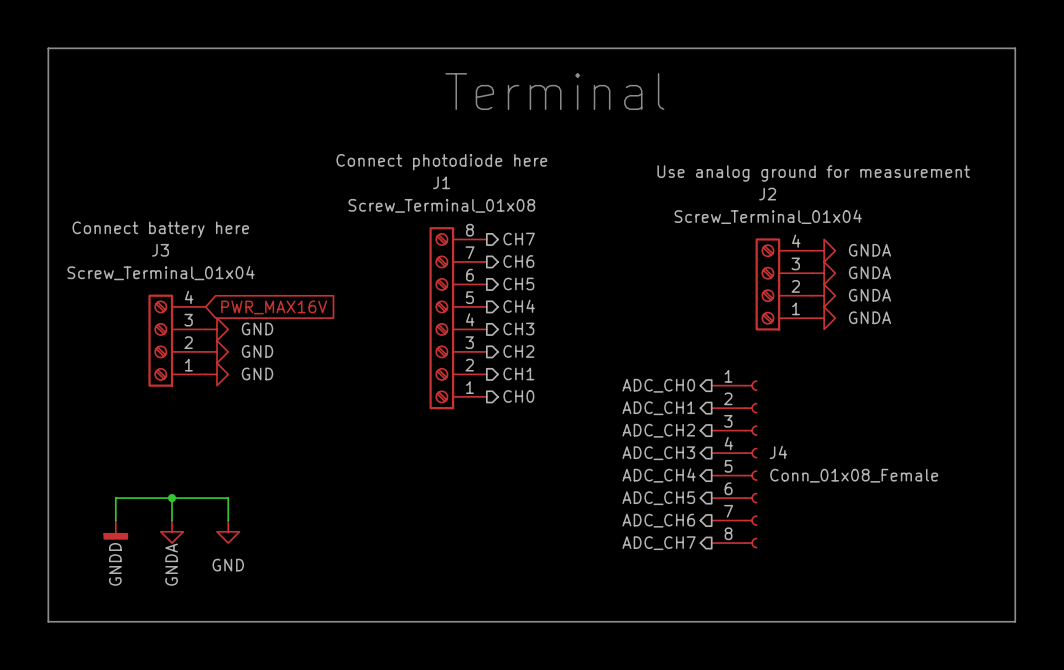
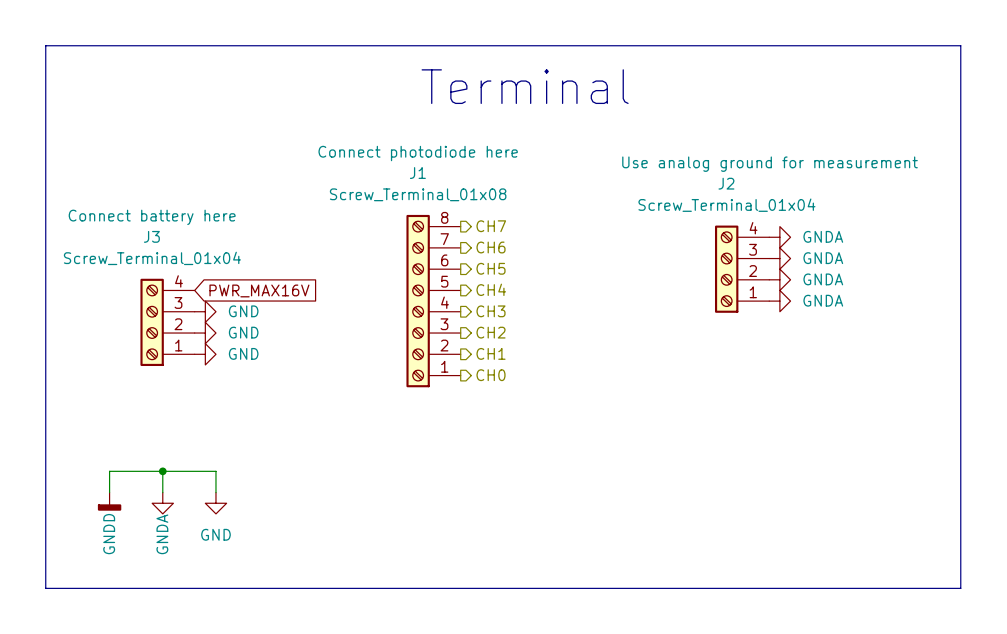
hierarchical label: ADC_CH0 (658, 385) -> none
hierarchical label: ADC_CH1 (658, 408) -> none
hierarchical label: ADC_CH2 (658, 430) -> none
hierarchical label: ADC_CH3 (658, 453) -> none
J4: Conn_01x08_Female (734, 464) -> none
hierarchical label: ADC_CH4 (659, 475) -> none
hierarchical label: ADC_CH5 (658, 498) -> none
hierarchical label: ADC_CH6 (658, 520) -> none
hierarchical label: ADC_CH7 (659, 543) -> none

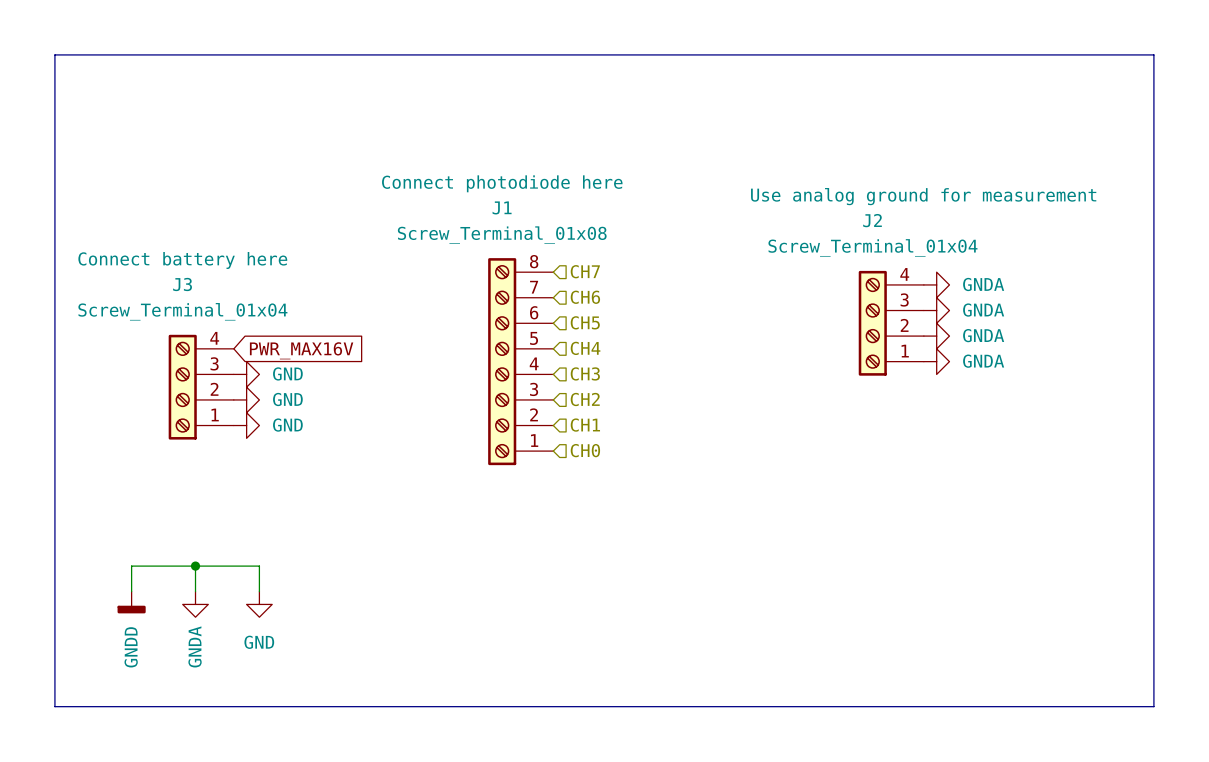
text: Terminal (525, 86) -> none
hierarchical label shape: output (491, 226) -> input (585, 271)
hierarchical label shape: output (491, 247) -> input (585, 297)
hierarchical label shape: output (491, 268) -> input (585, 322)
hierarchical label shape: output (491, 289) -> input (585, 348)
hierarchical label shape: output (491, 311) -> input (585, 373)
hierarchical label shape: output (491, 332) -> input (585, 399)
hierarchical label shape: output (491, 353) -> input (585, 425)
hierarchical label shape: output (491, 375) -> input (585, 450)

